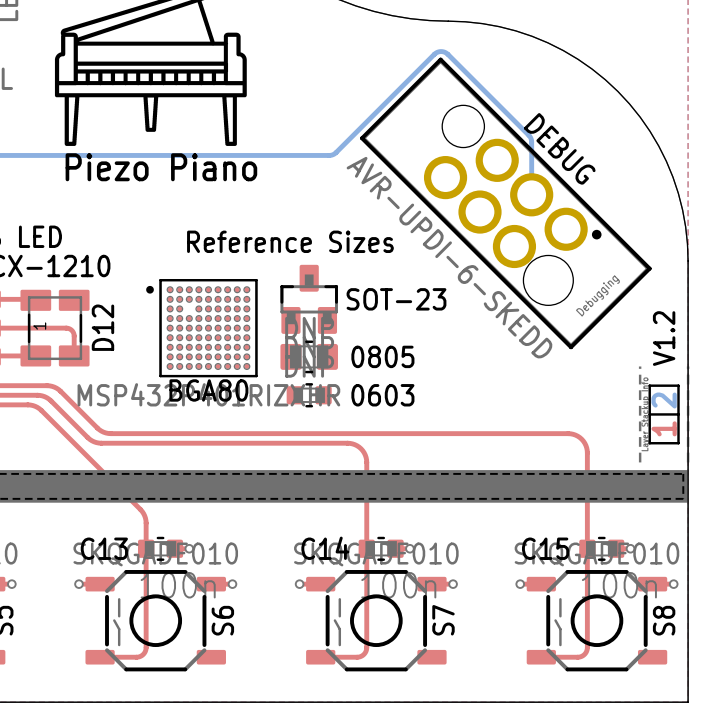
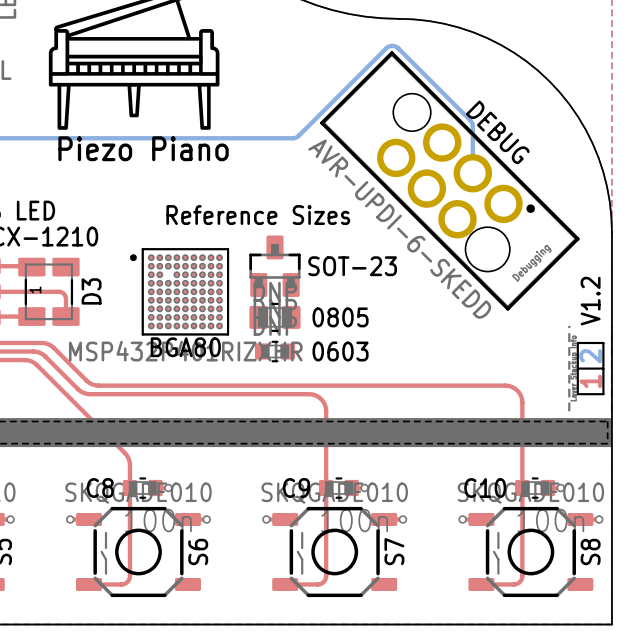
D12 name: D12 (102, 327) -> D3 (91, 291)
C13 name: C13 (104, 548) -> C8 (100, 488)
C14 name: C14 (325, 548) -> C9 (296, 488)
C15 name: C15 (545, 548) -> C10 (485, 488)

